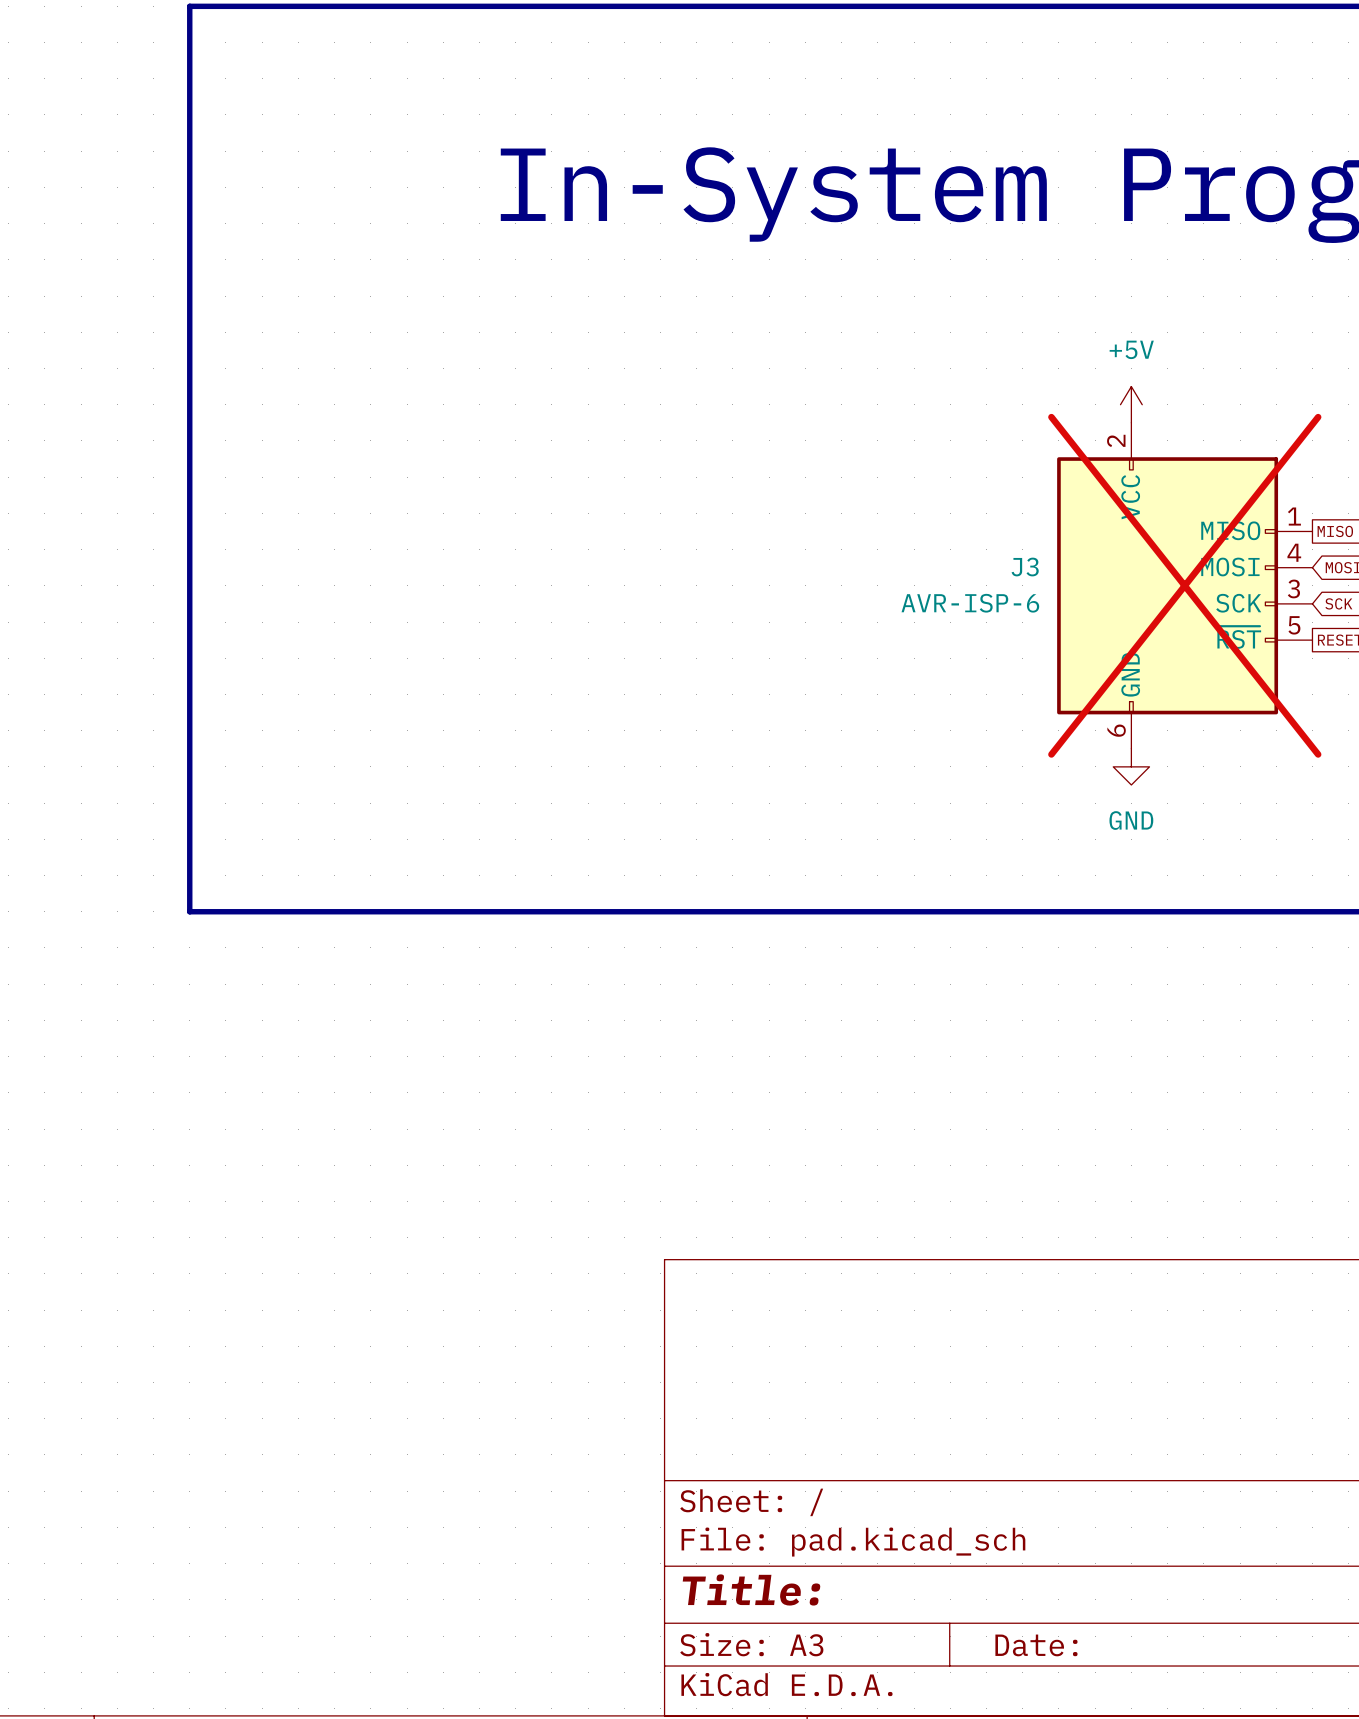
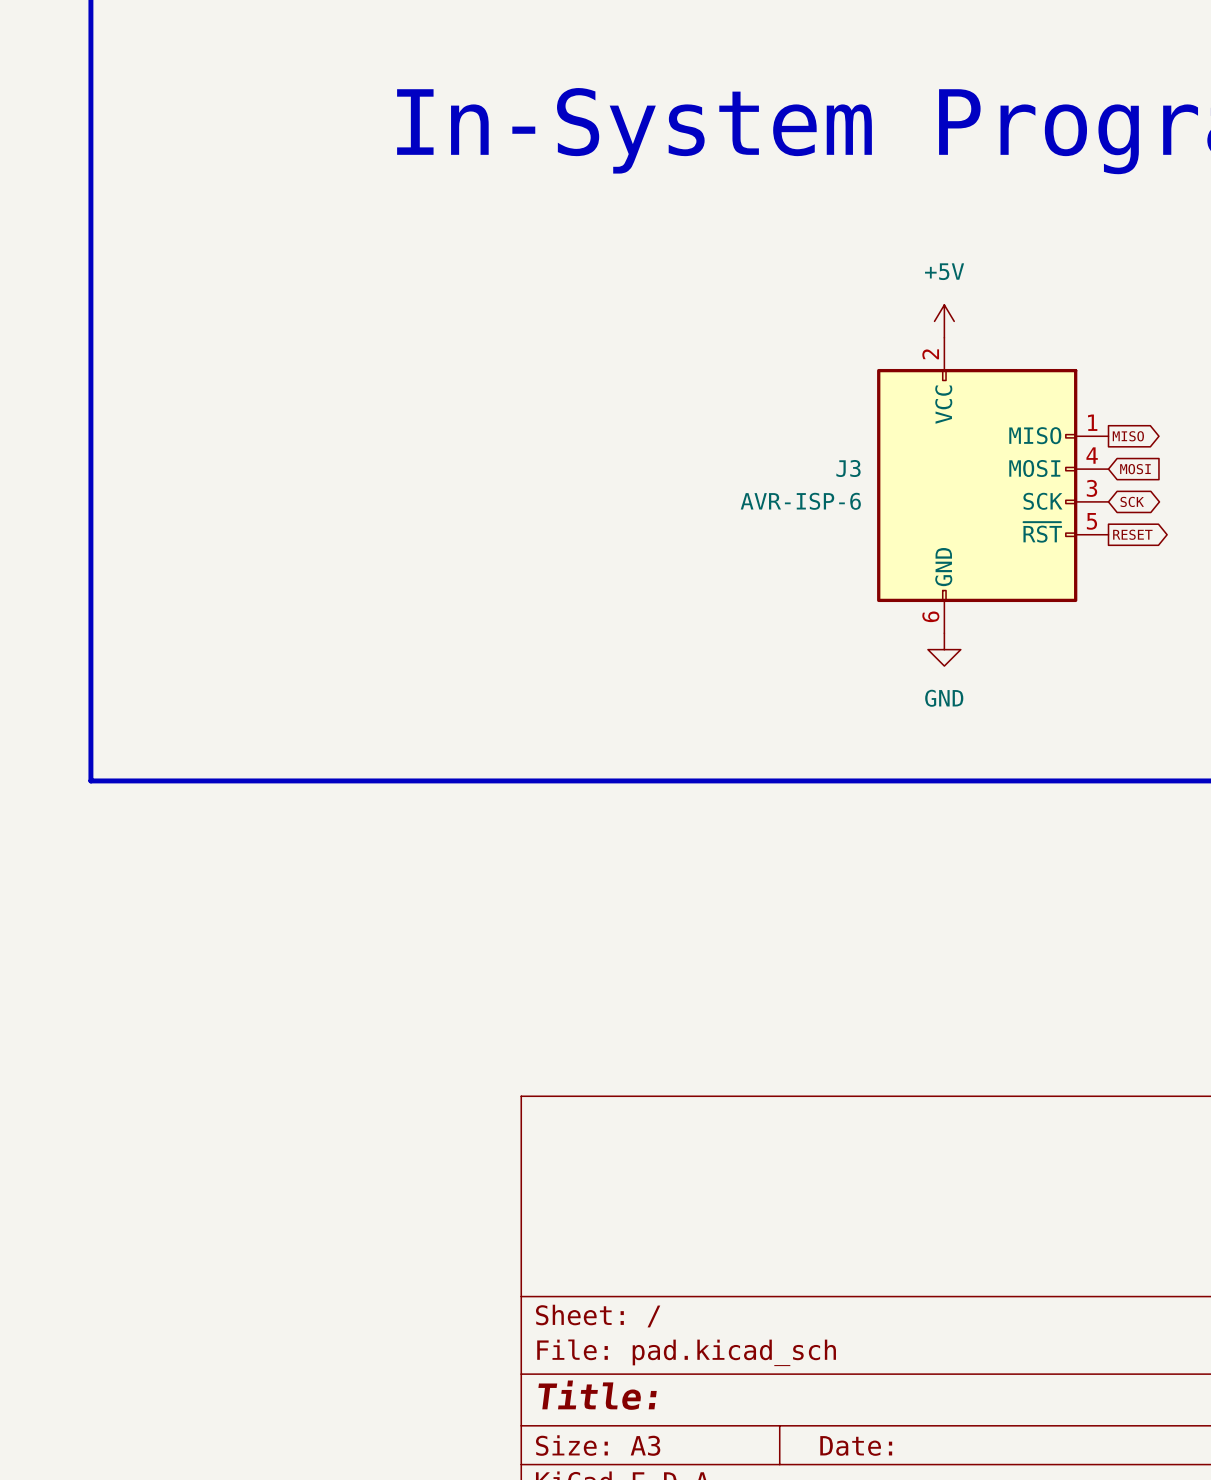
J3 do-not-place cross: (1184, 585) -> none

